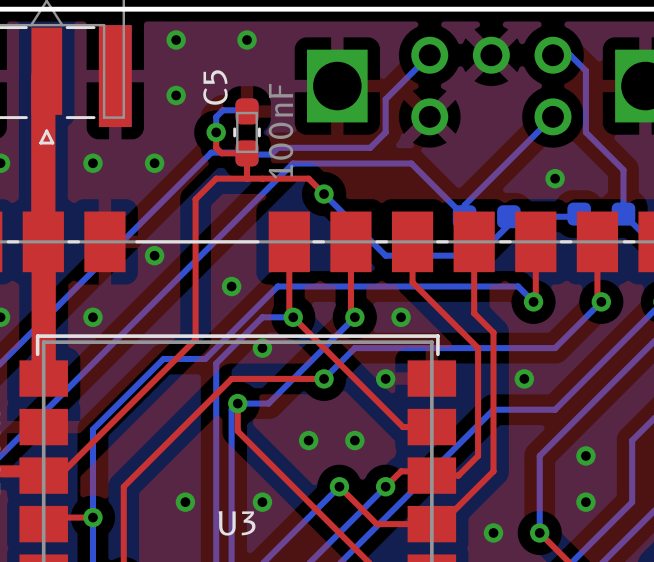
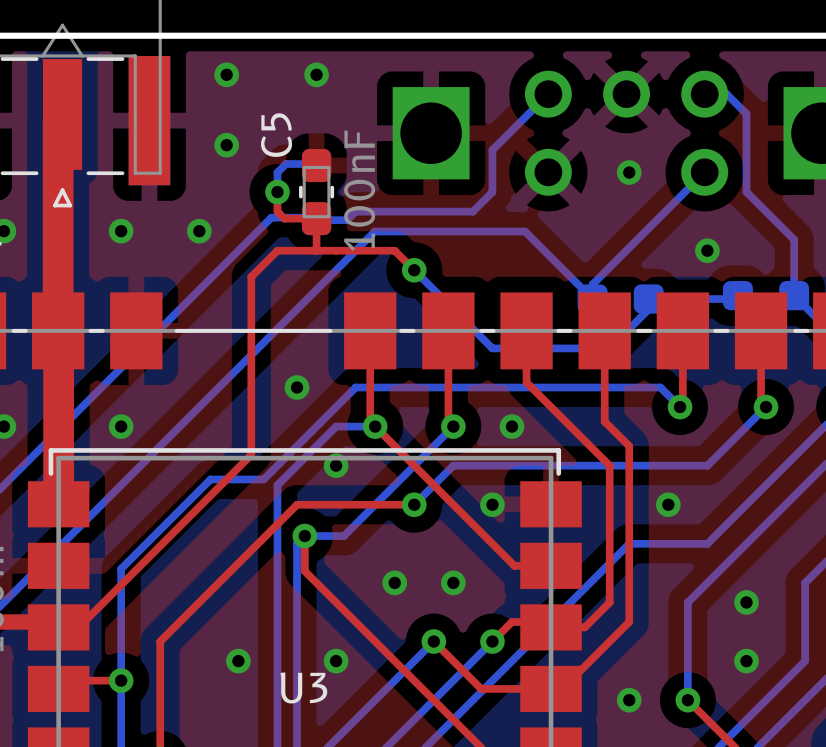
via: none -> (629, 172)
via: (154, 255) -> none

